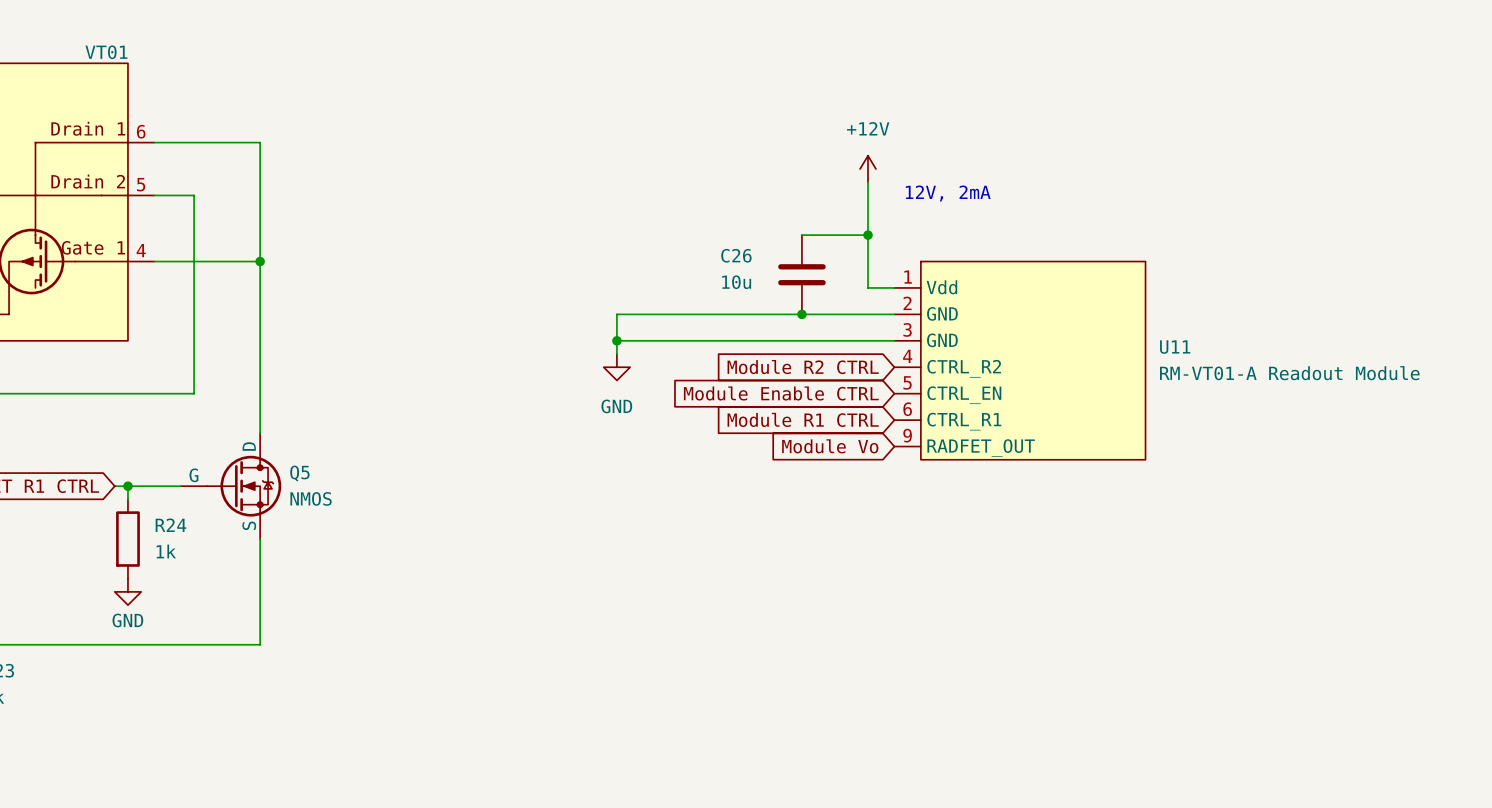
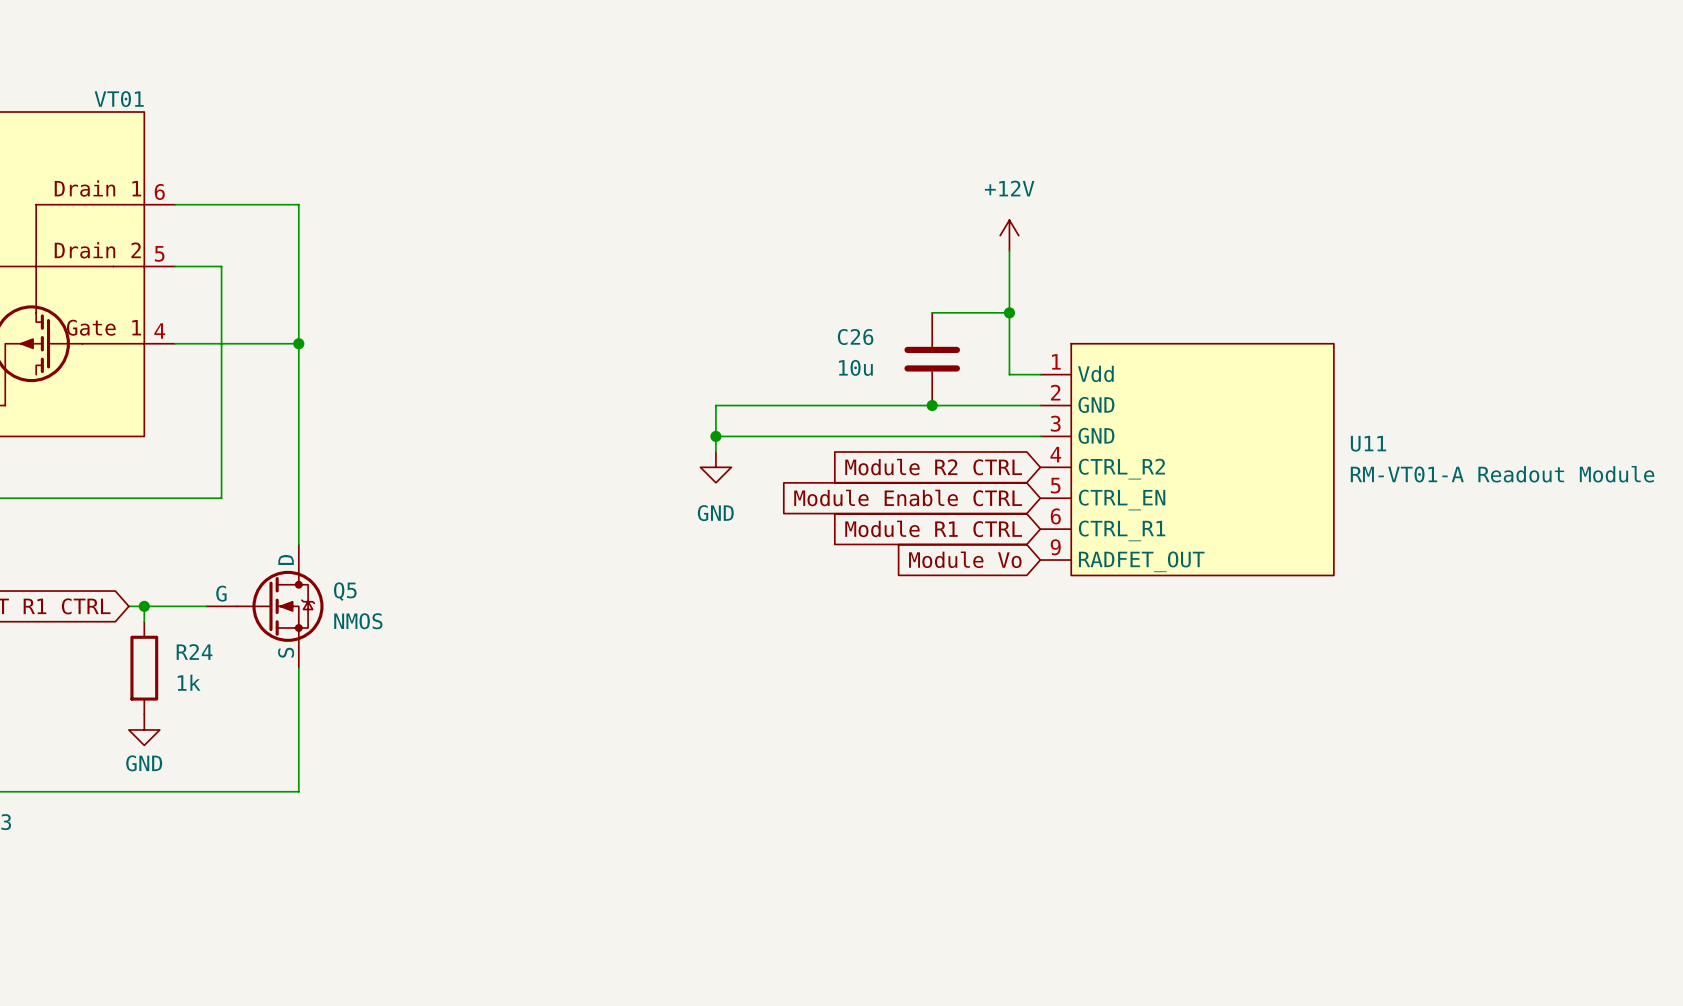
text: 12V, 2mA (948, 193) -> none

